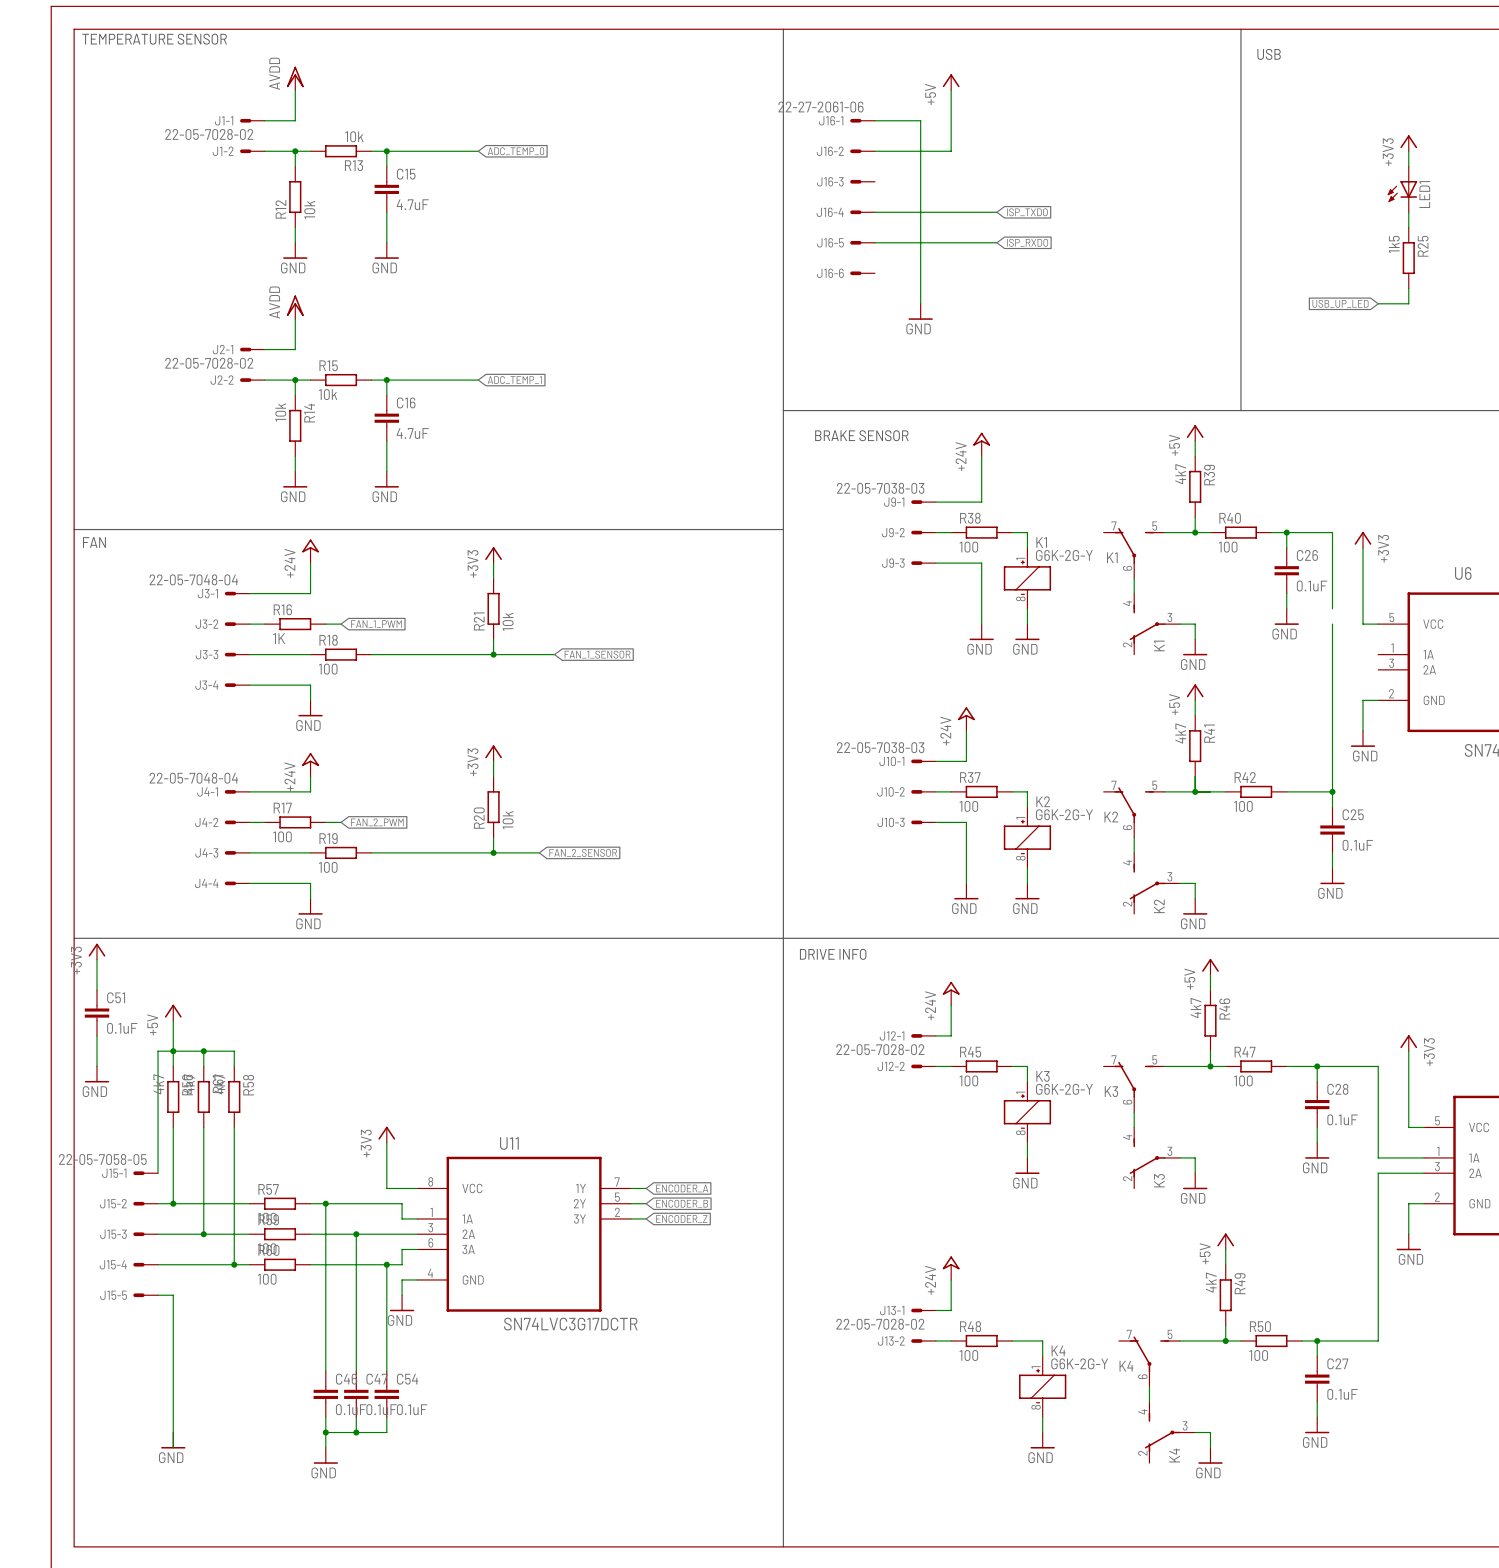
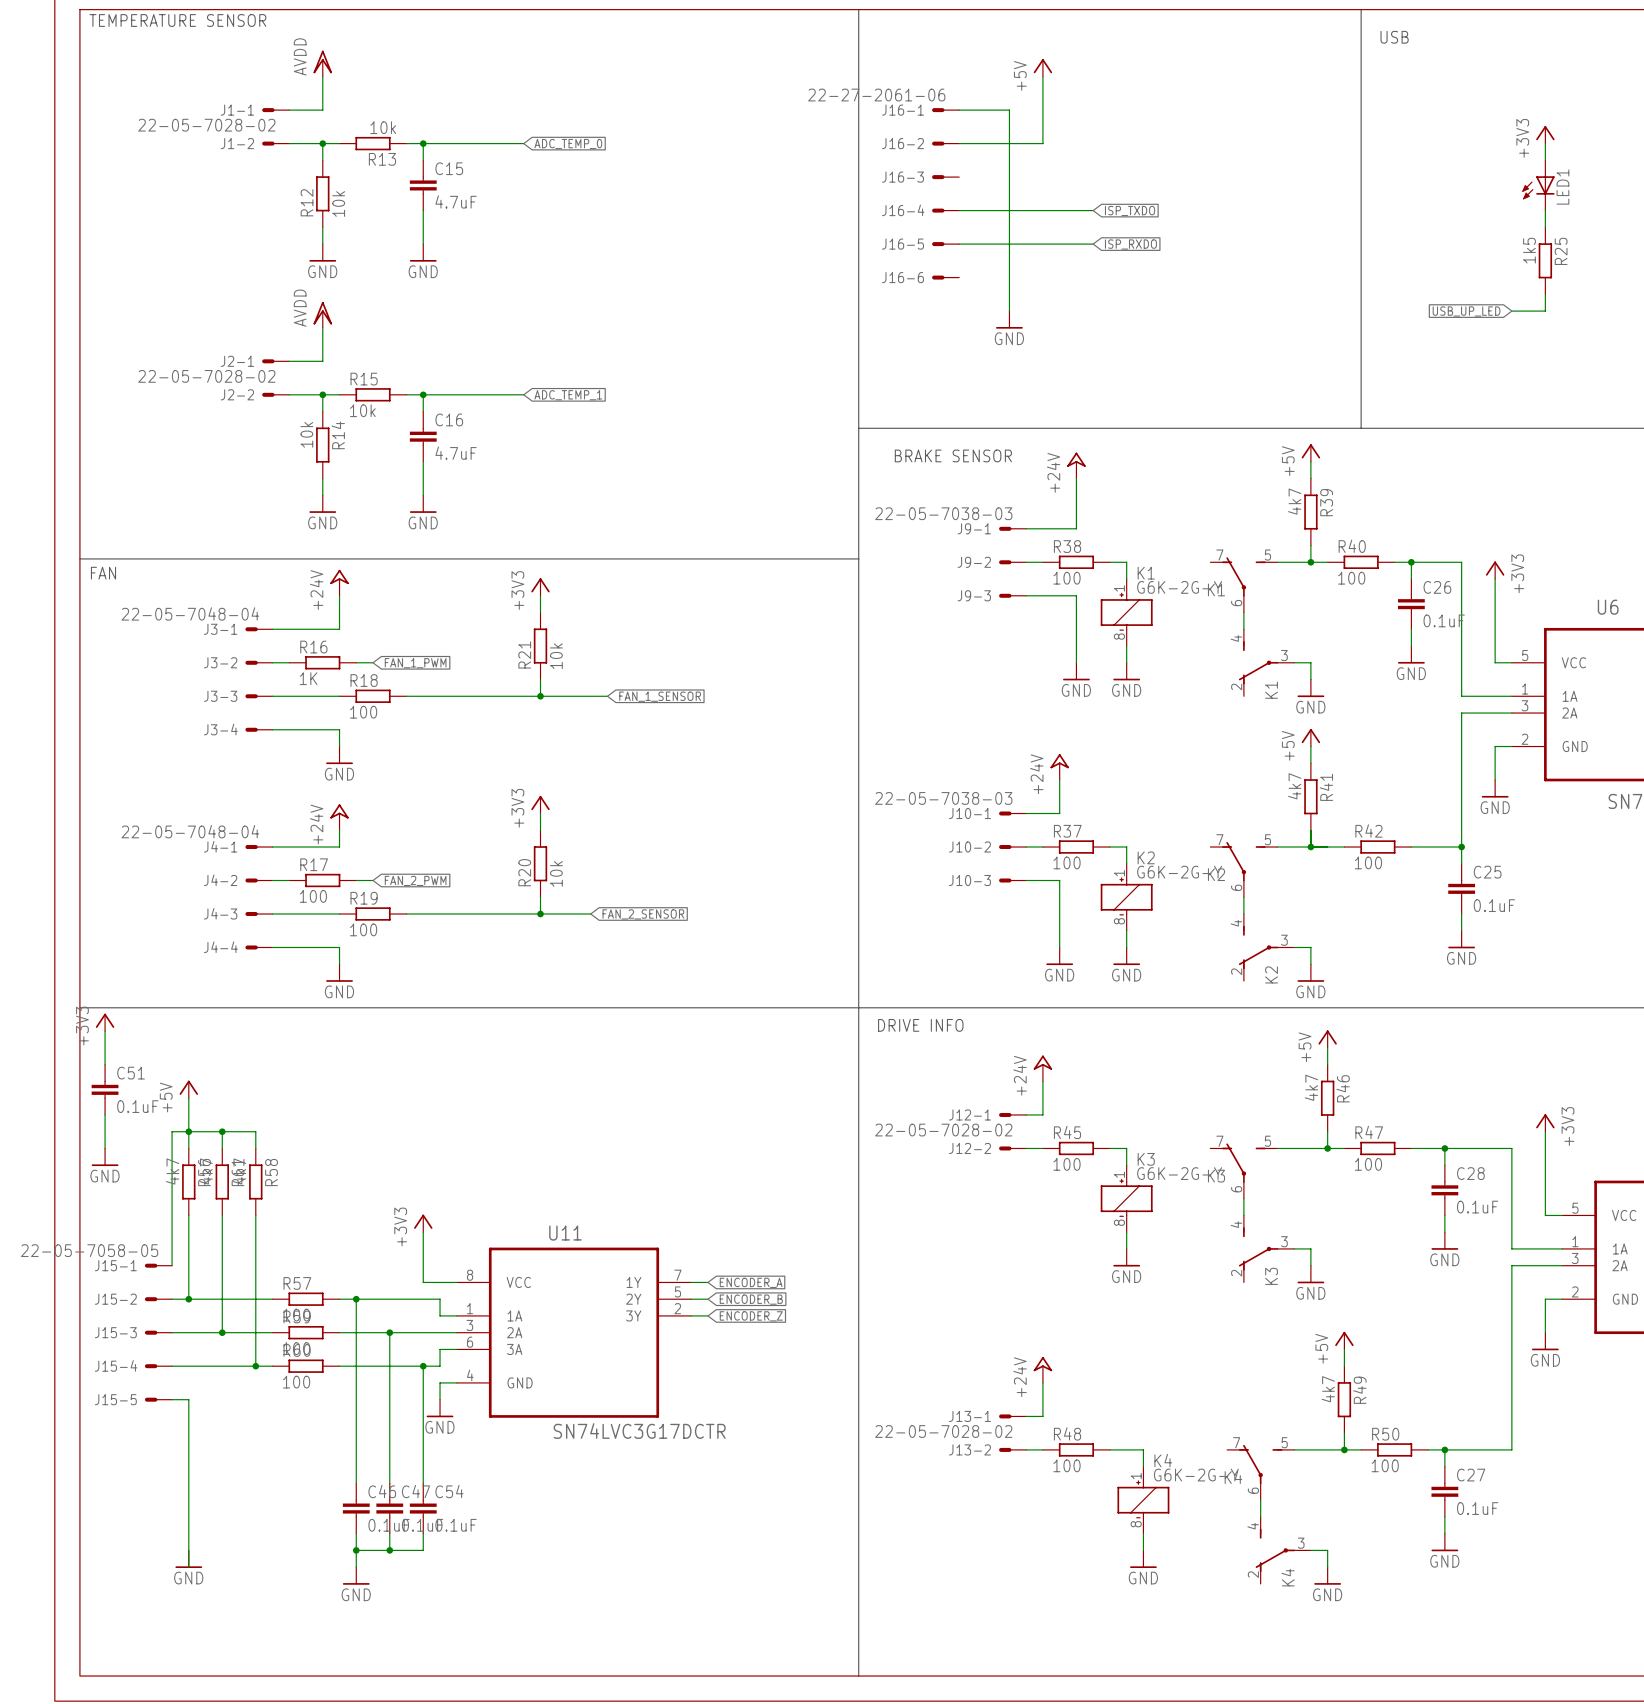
wire: none -> (1461, 646) (1461, 662)
wire: (1332, 654) (1332, 669) -> (1461, 696) (1511, 696)
wire: none -> (1461, 713) (1511, 713)

